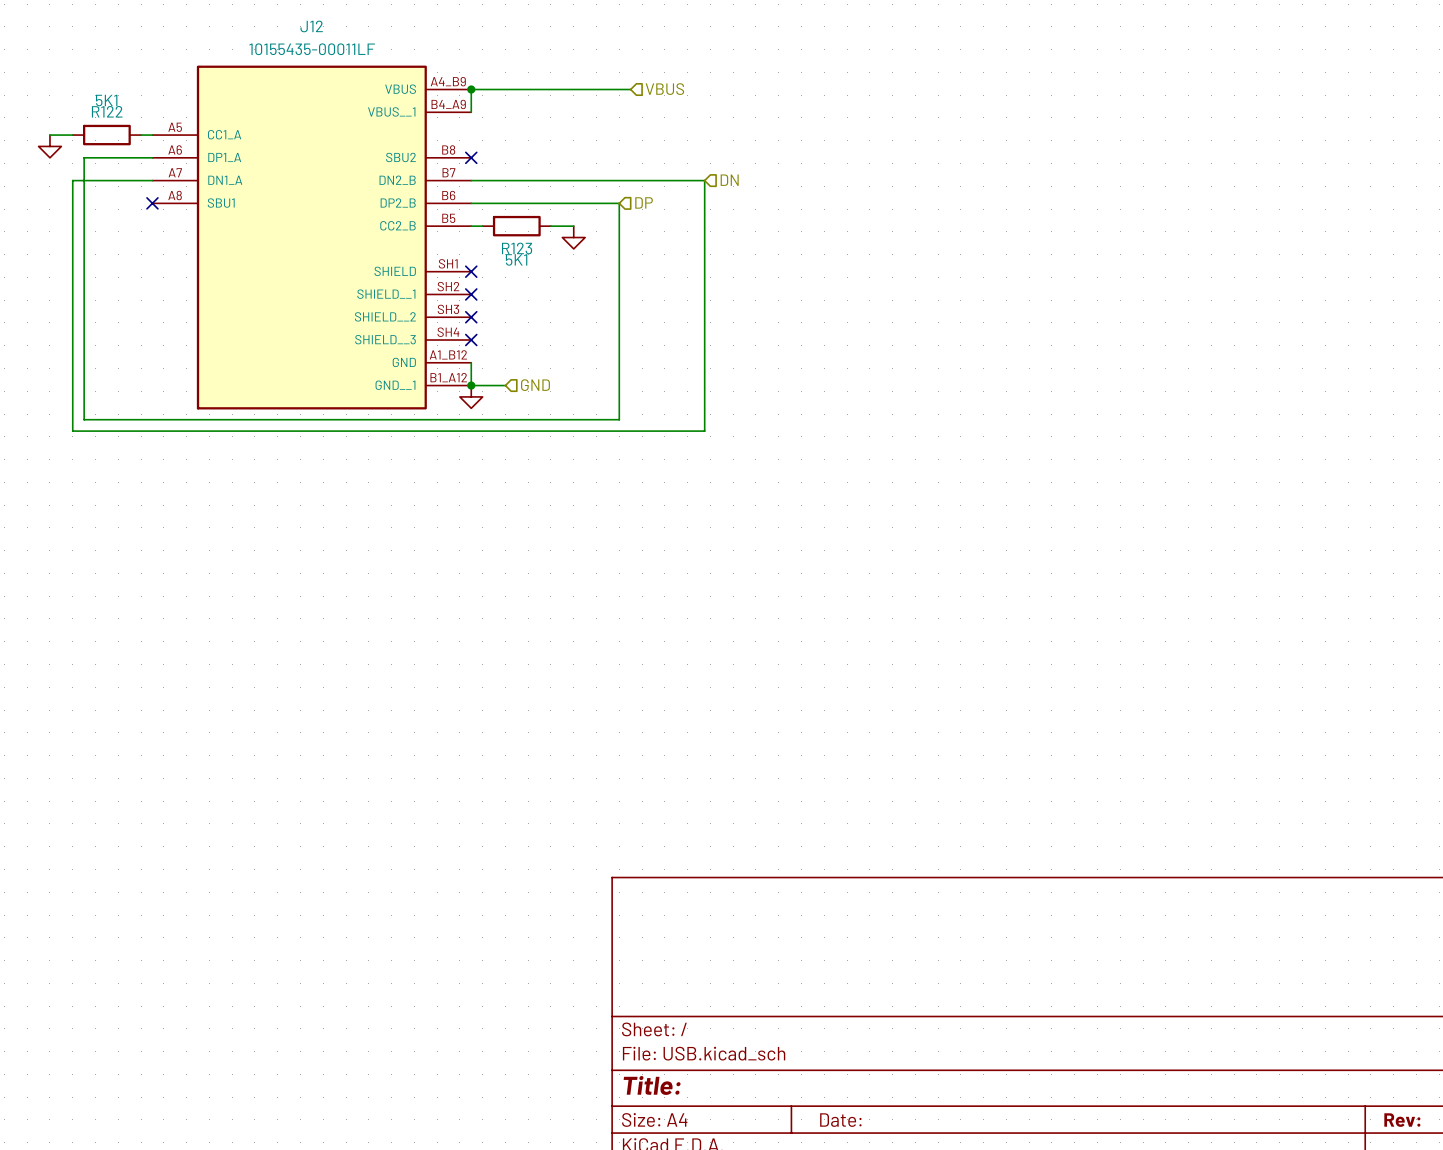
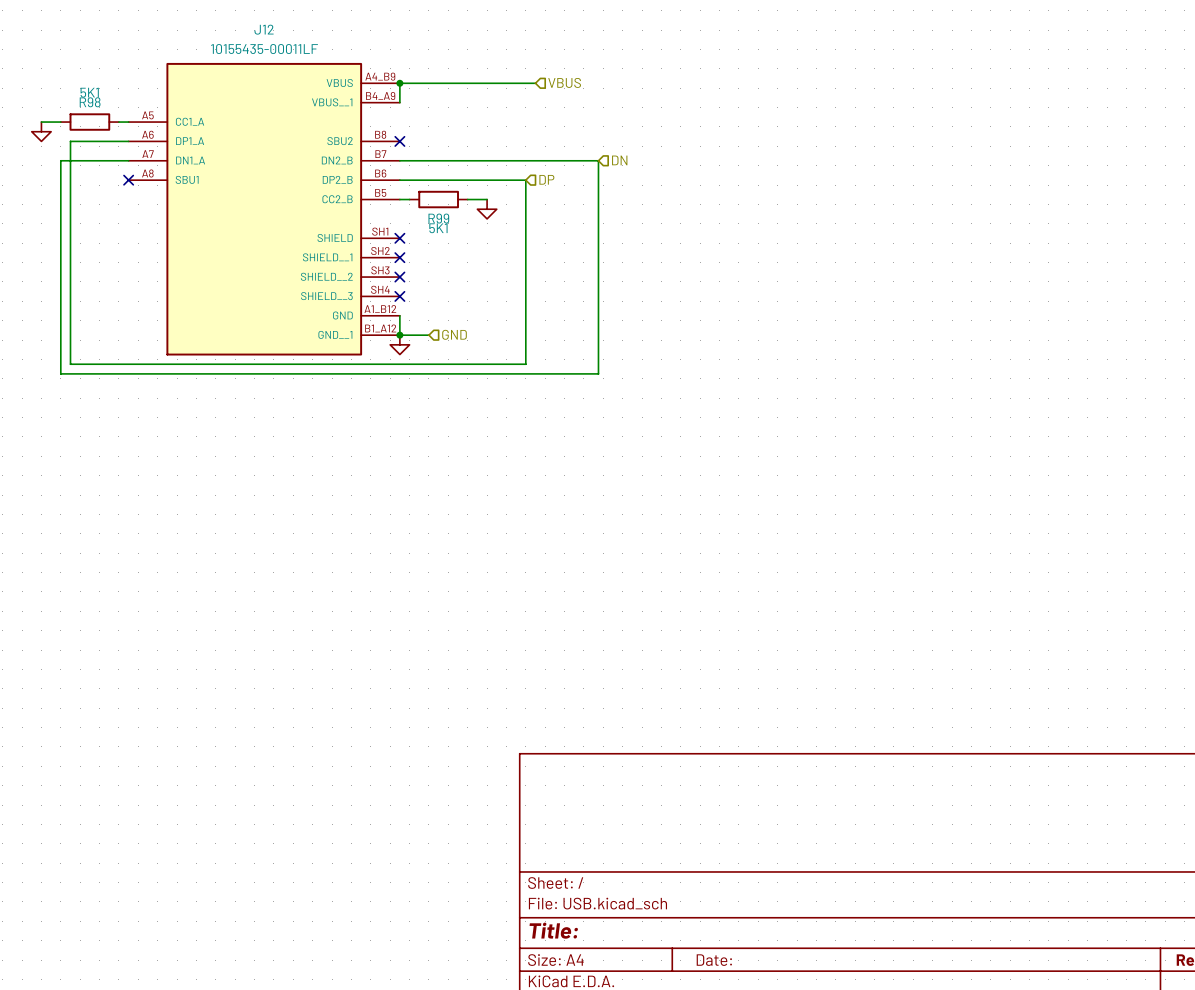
R122 name: R122 (107, 111) -> R98 (90, 102)
R123 name: R123 (517, 248) -> R99 (438, 218)

